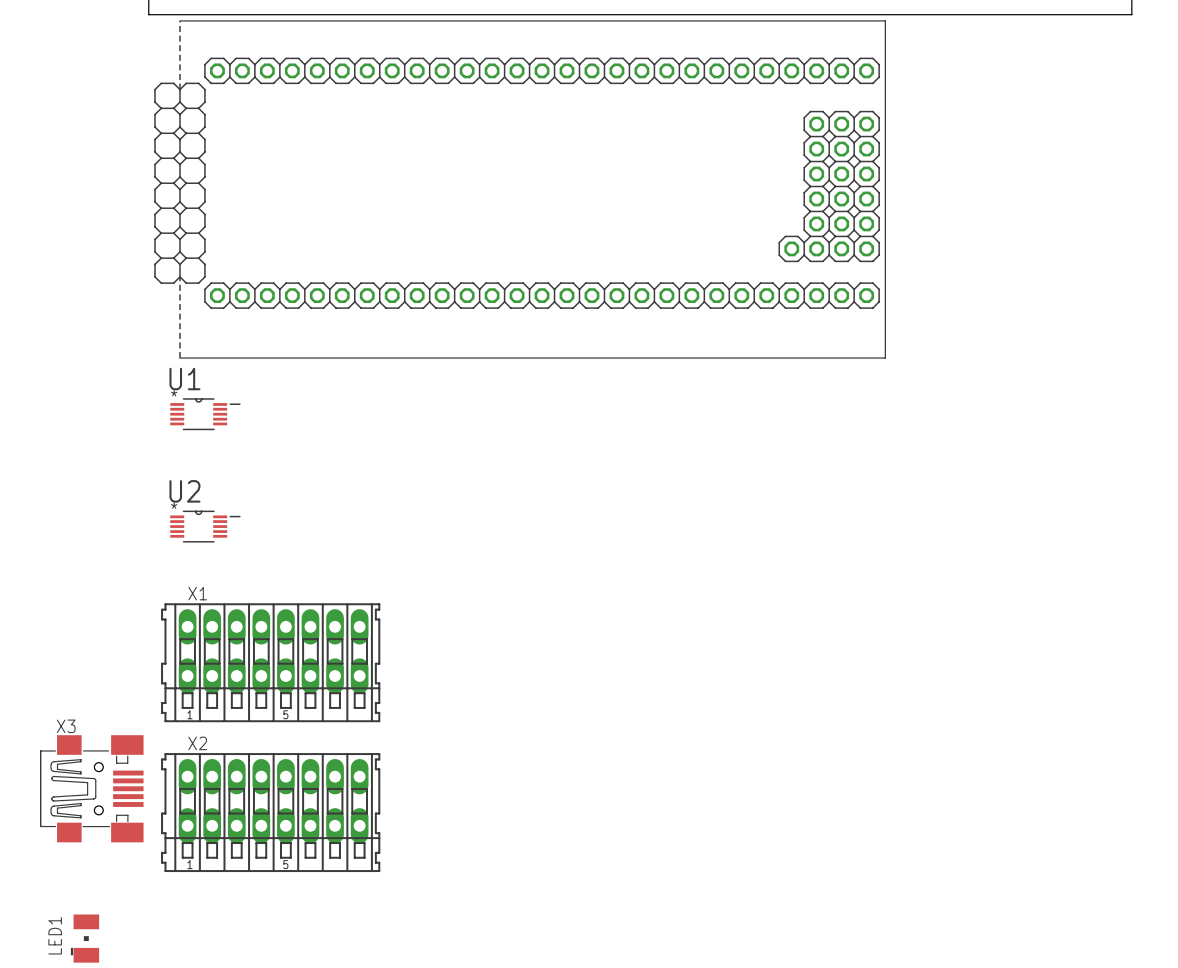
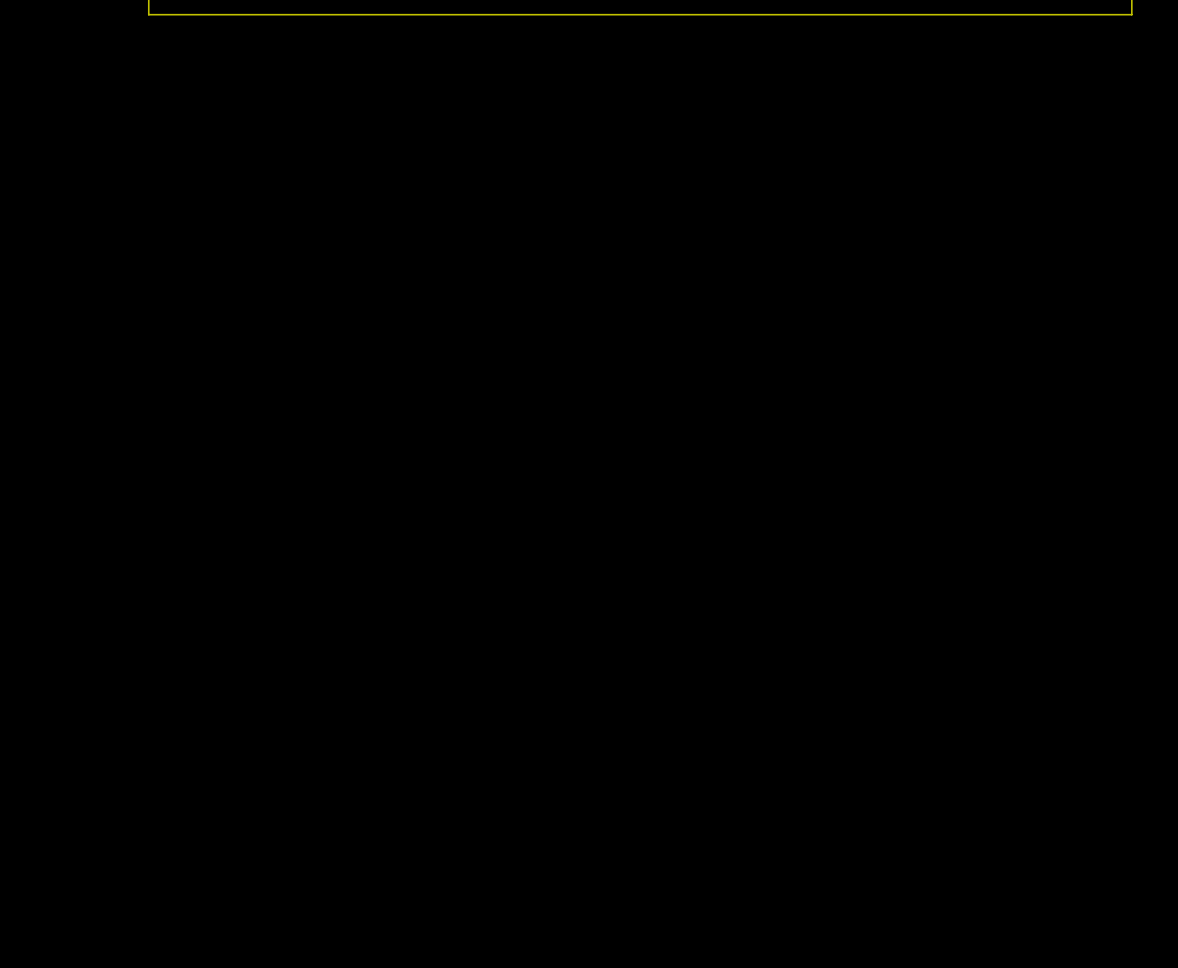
part: (520, 189) -> none
U1: (205, 414) -> none
U2: (205, 526) -> none
X1: (270, 662) -> none
X3: (91, 788) -> none
X2: (270, 812) -> none
LED1: (84, 938) -> none

